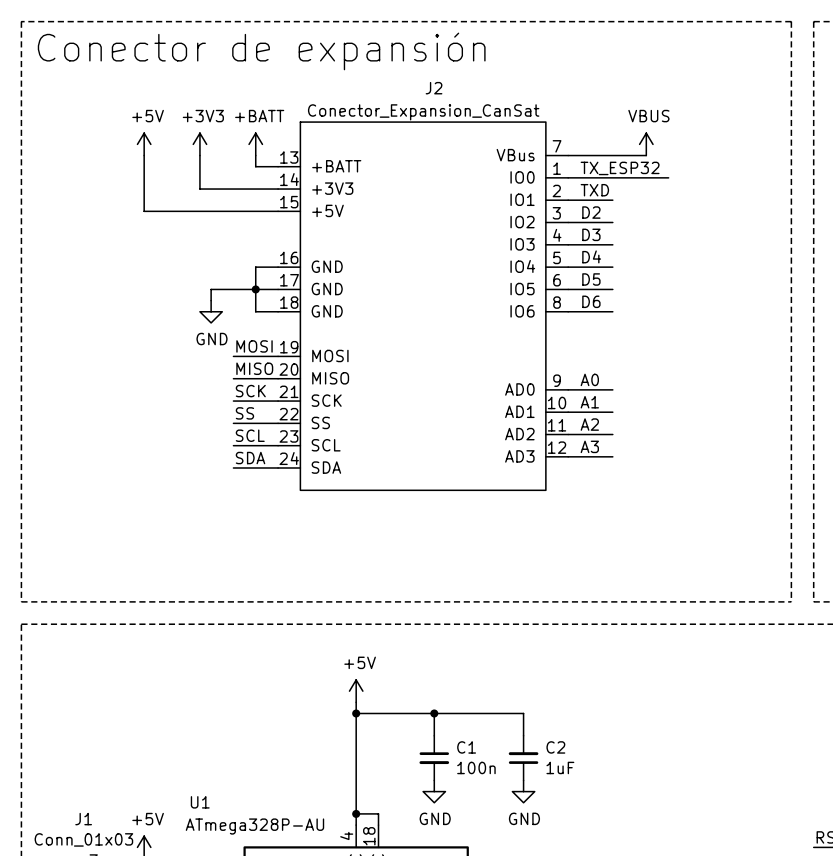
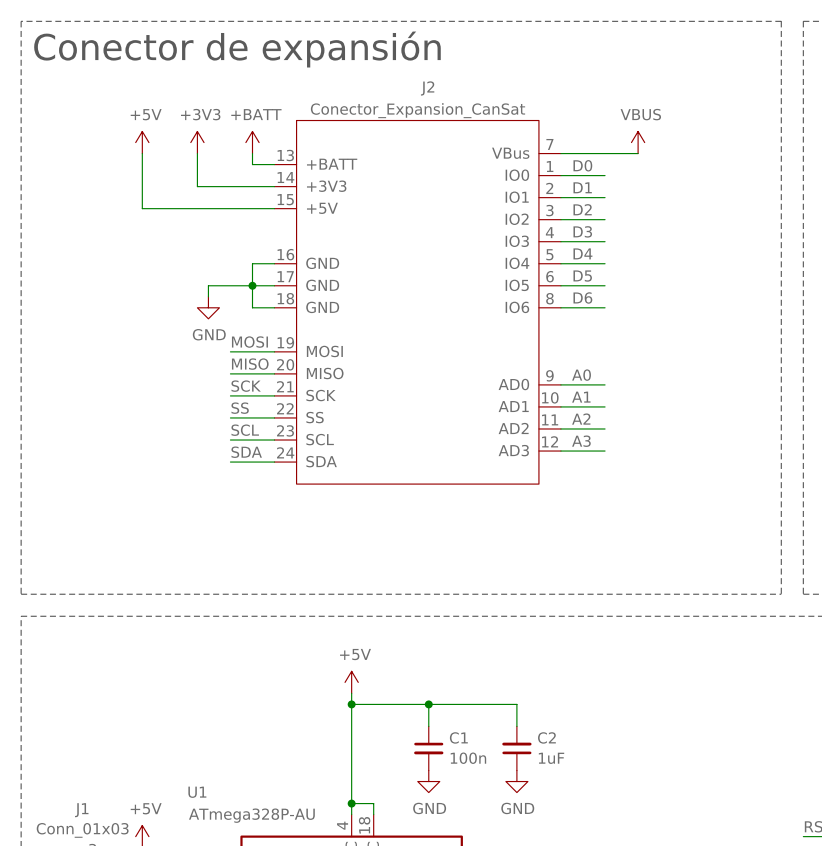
label: TX_ESP32 (620, 168) -> D0 (582, 165)
wire: (612, 177) (668, 177) -> none
label: TXD (594, 190) -> D1 (582, 187)

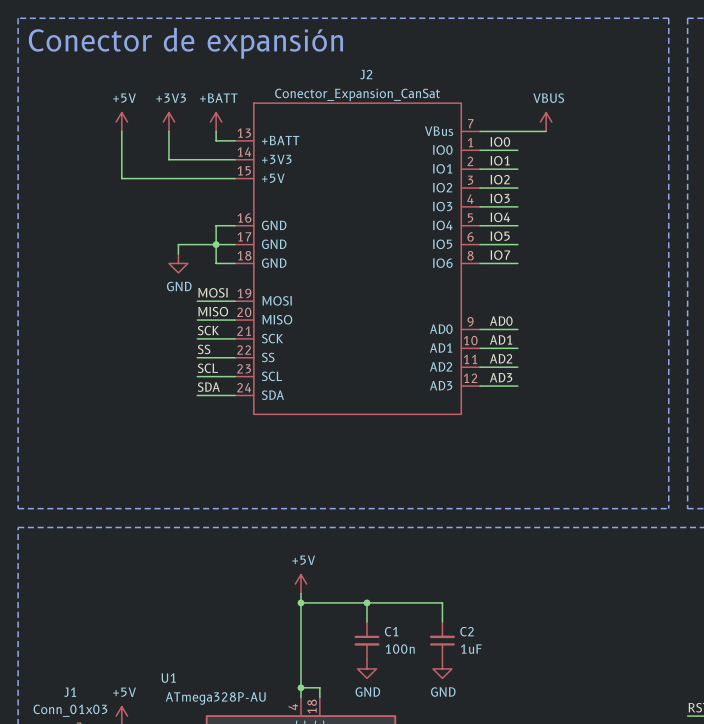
label: D0 (582, 165) -> IO0 (500, 141)
label: D1 (582, 187) -> IO1 (500, 160)
label: D2 (582, 209) -> IO2 (500, 179)
label: D3 (582, 231) -> IO3 (500, 198)
label: D4 (582, 253) -> IO4 (500, 217)
label: D5 (582, 276) -> IO5 (500, 236)
label: D6 (582, 297) -> IO7 (500, 255)
label: A0 (581, 375) -> AD0 (501, 321)
label: A1 (581, 397) -> AD1 (501, 339)
label: A2 (581, 419) -> AD2 (501, 358)
label: A3 (581, 441) -> AD3 (501, 377)

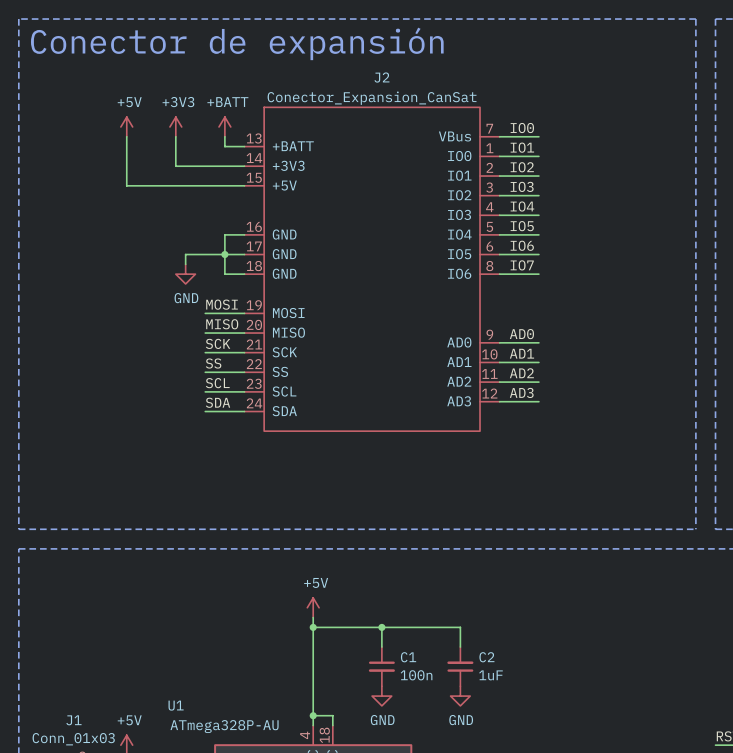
power symbol: VBUS (546, 122) -> none
label: none -> IO0 (522, 128)
wire: (517, 131) (546, 131) -> none
label: IO0 (500, 141) -> IO1 (522, 147)
label: IO1 (500, 160) -> IO2 (522, 167)
label: IO2 (500, 179) -> IO3 (522, 186)
label: IO3 (500, 198) -> IO4 (522, 206)
label: IO4 (500, 217) -> IO5 (522, 226)
label: IO5 (500, 236) -> IO6 (522, 245)

